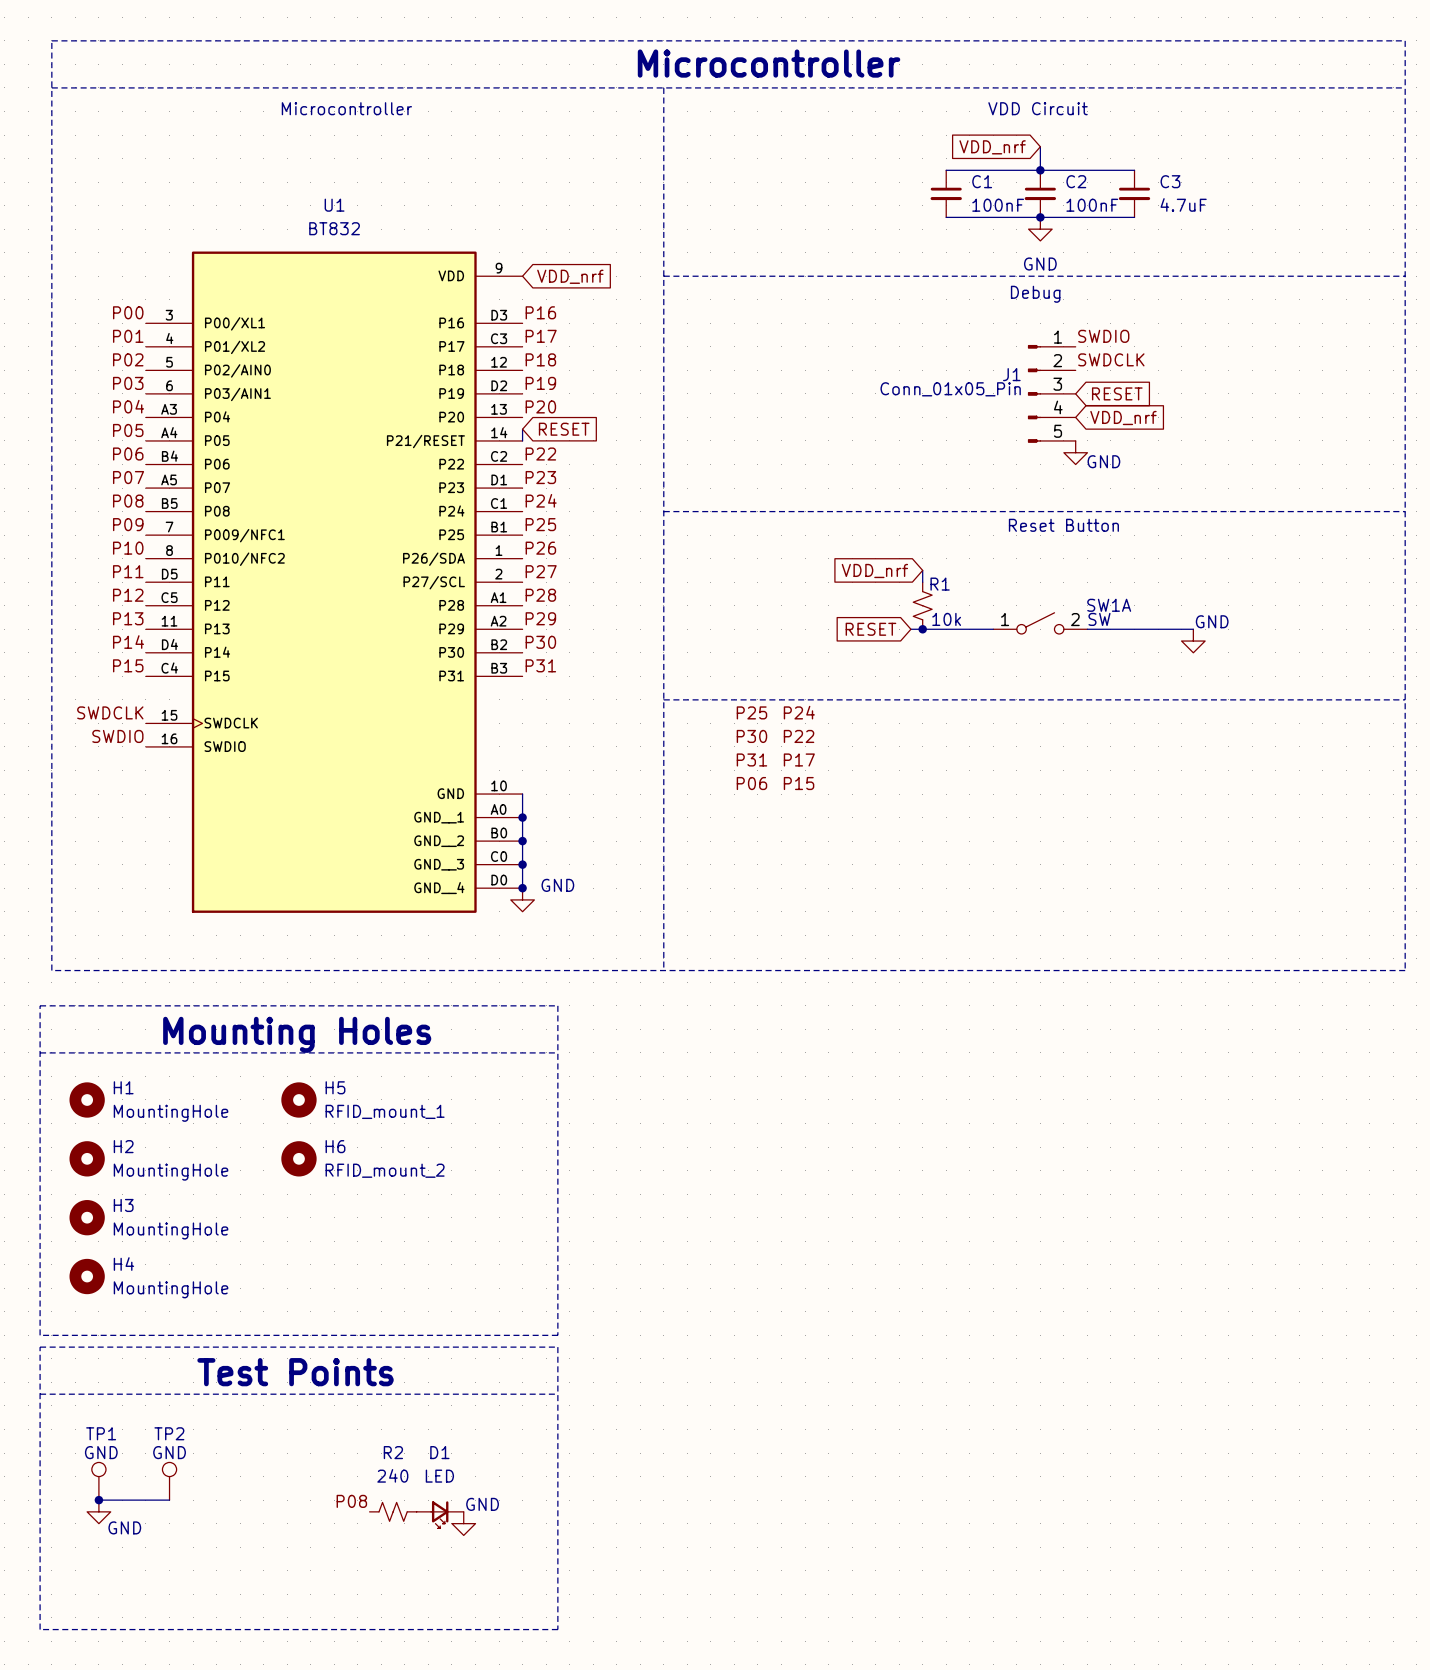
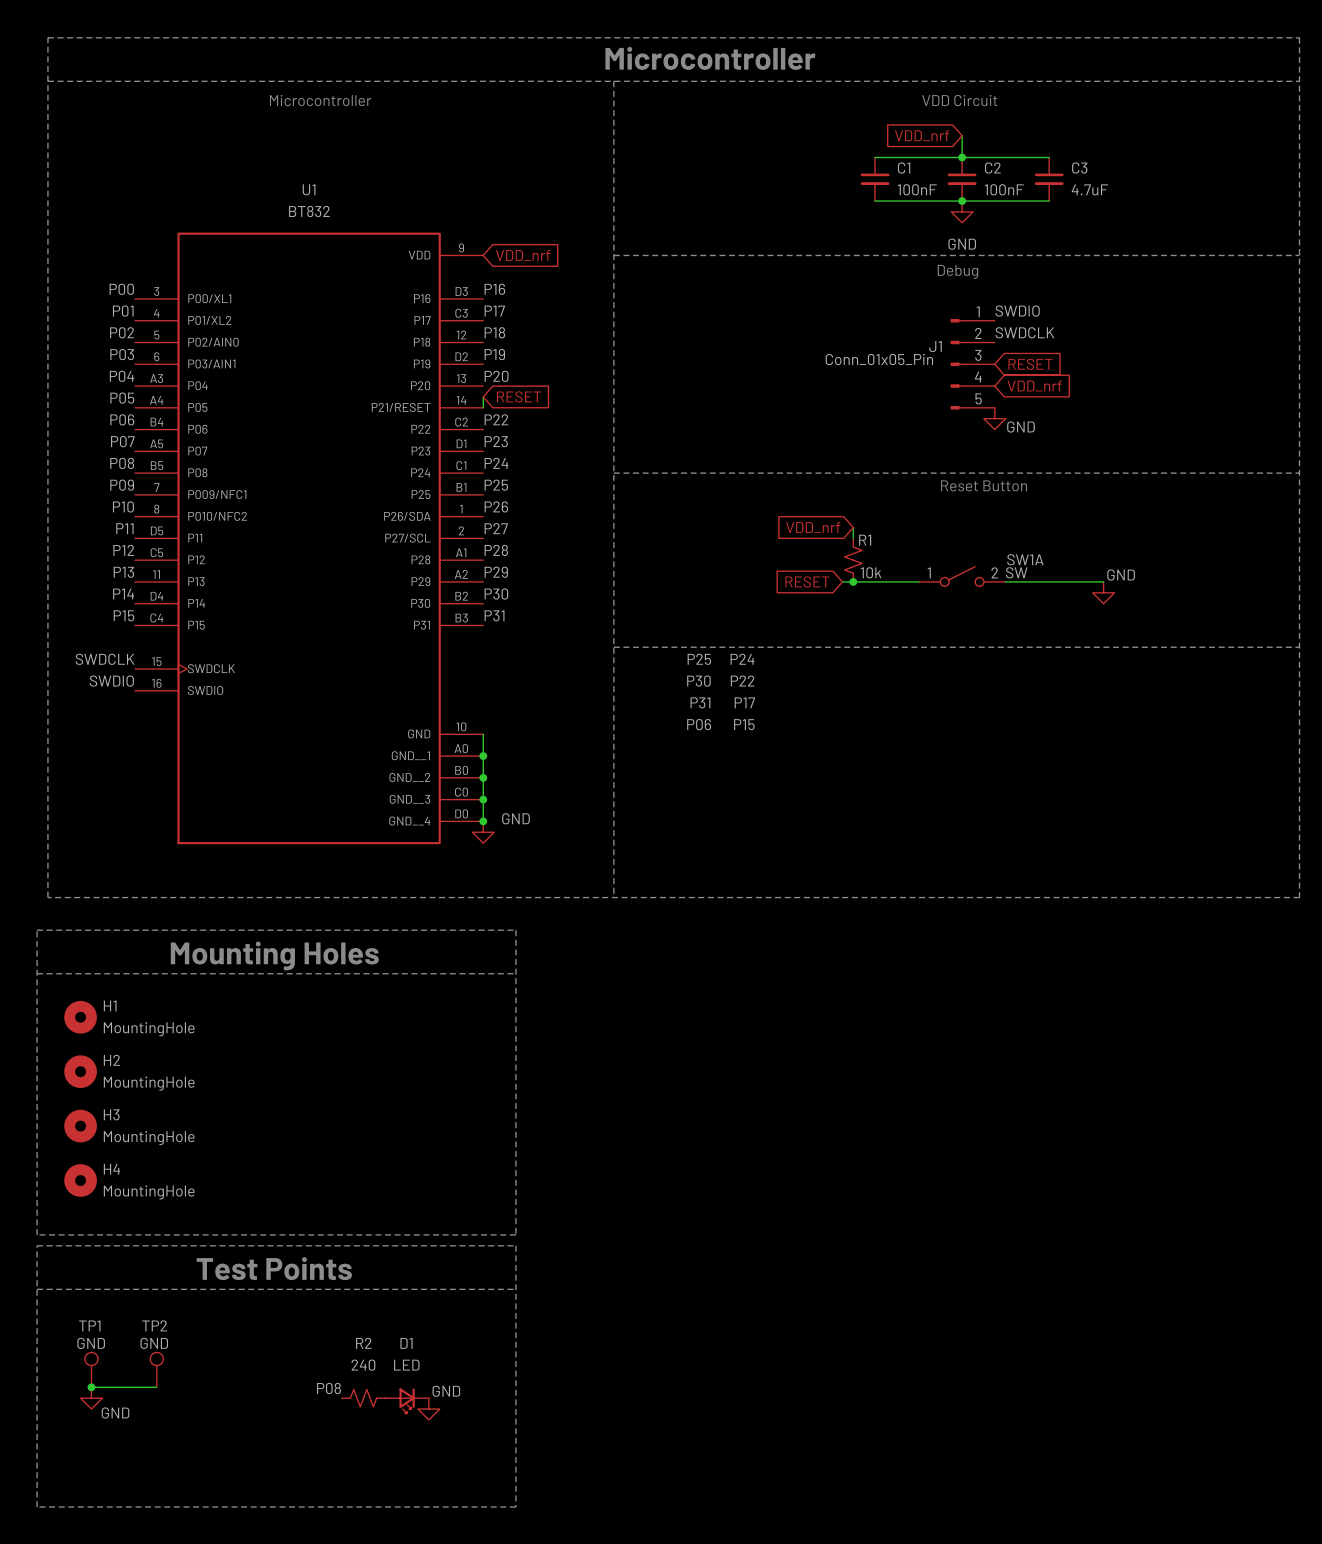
H5: RFID_mount_1 (298, 1099) -> none
H6: RFID_mount_2 (298, 1158) -> none

